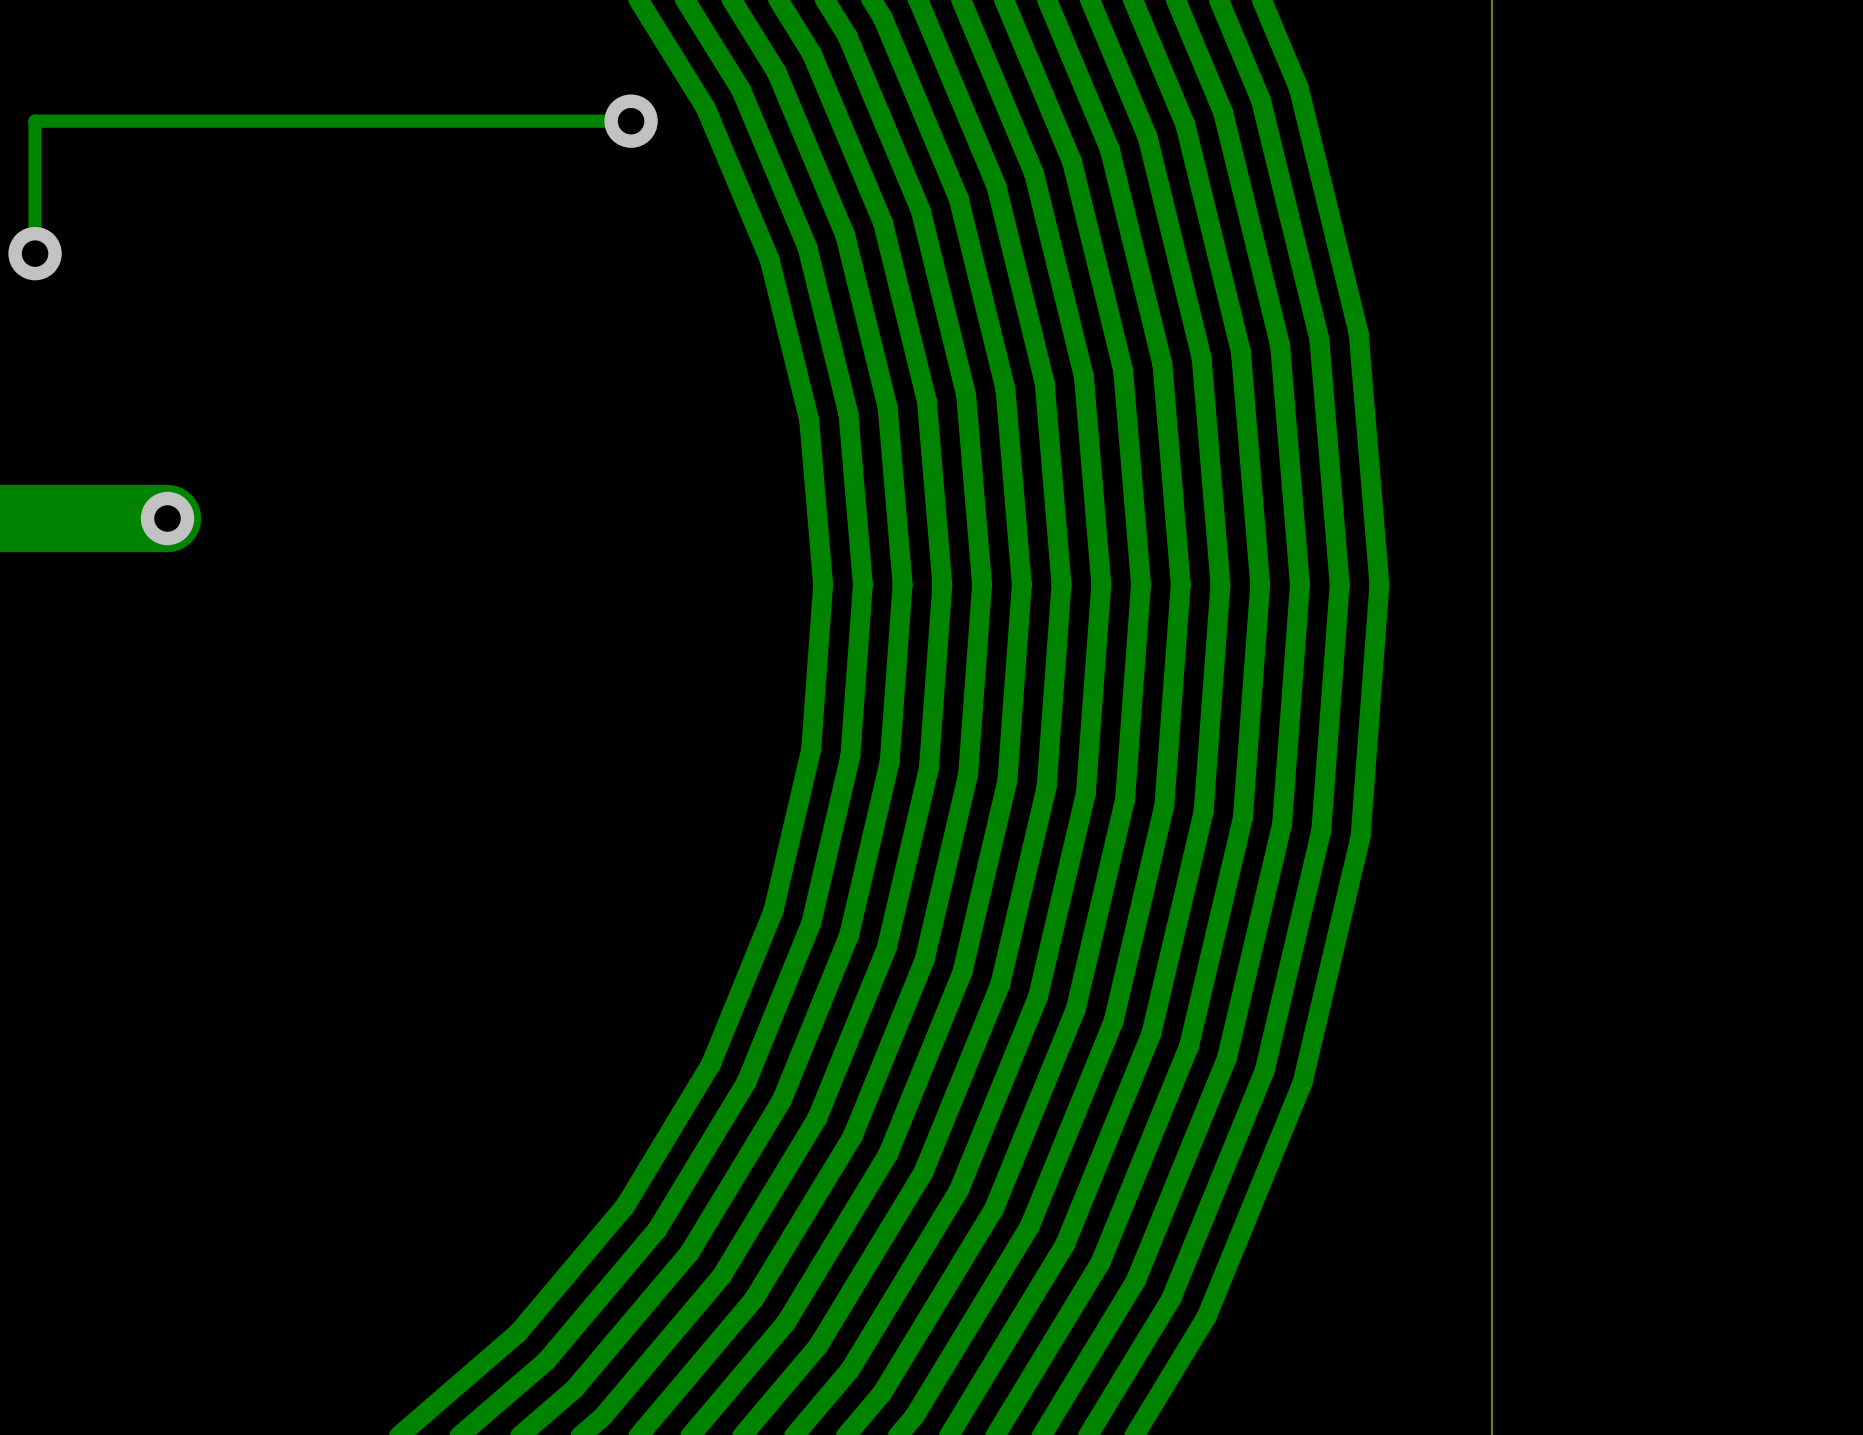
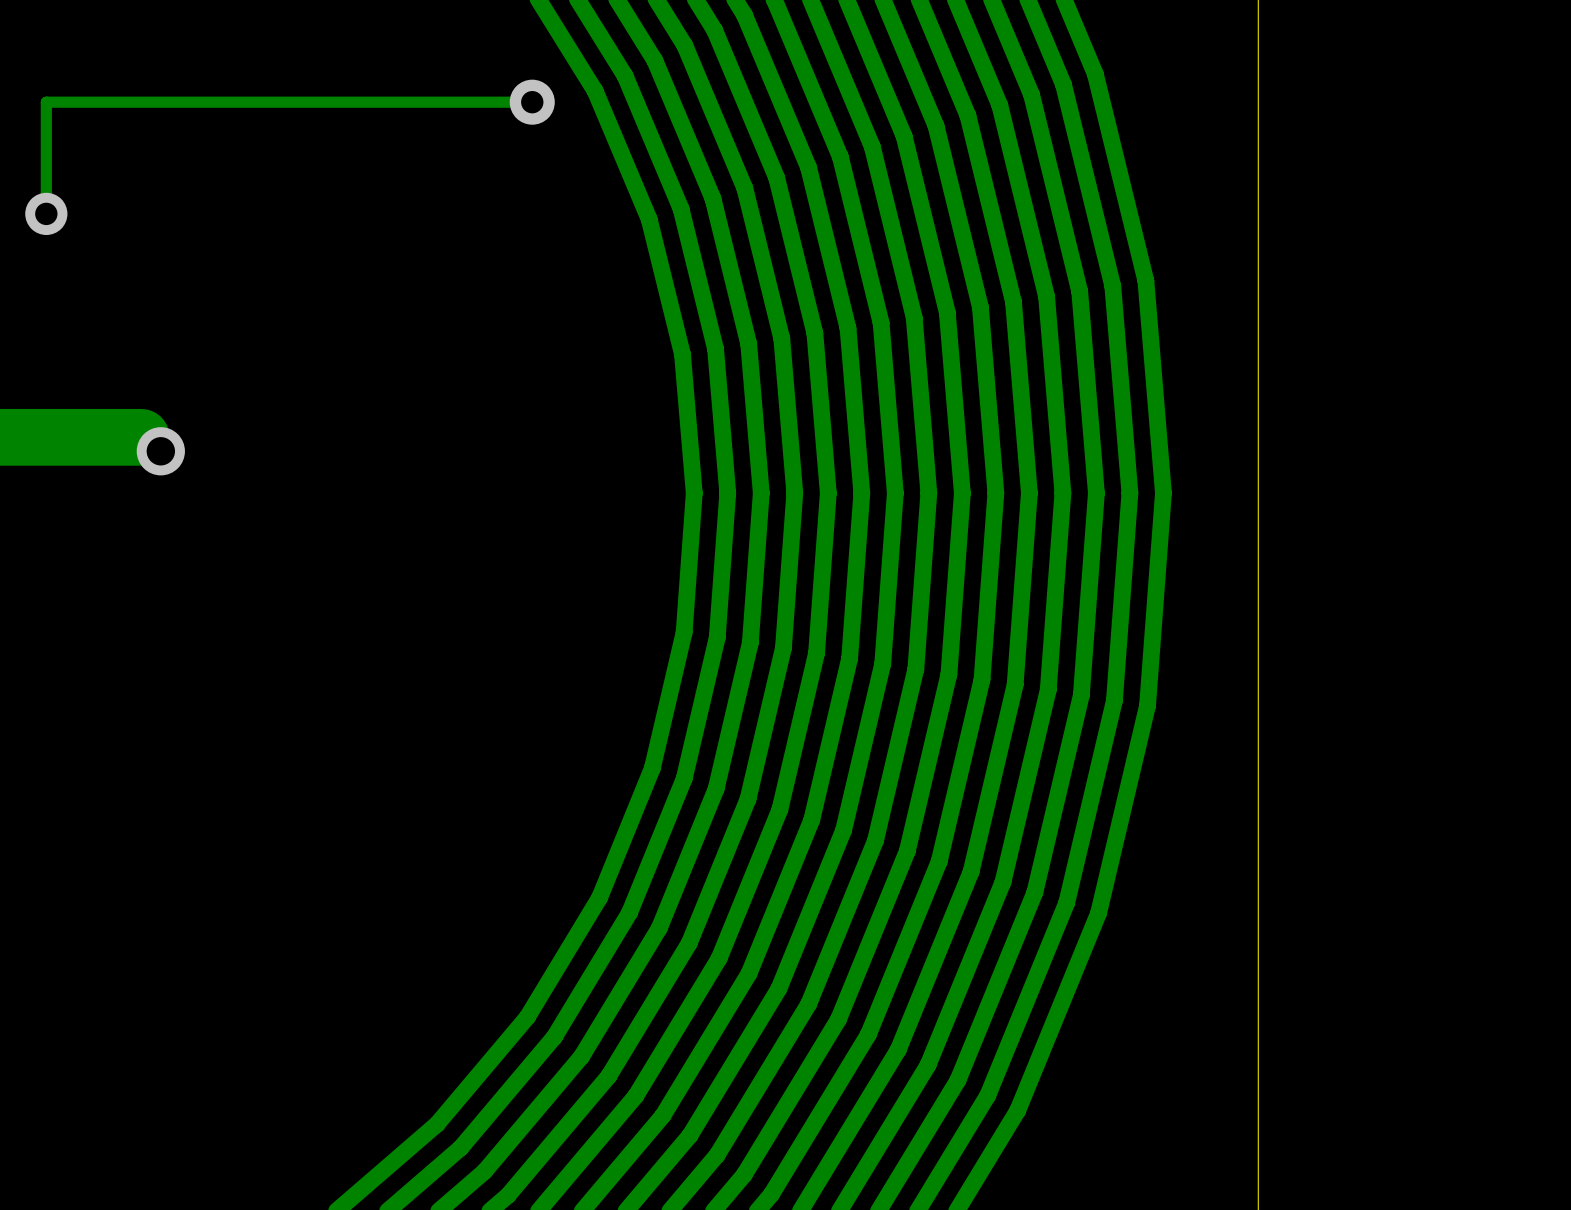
track: (54, 121) (35, 121) (35, 253) -> (46, 102) (46, 213)
via position: (35, 253) -> (46, 213)
via position: (167, 518) -> (160, 451)

